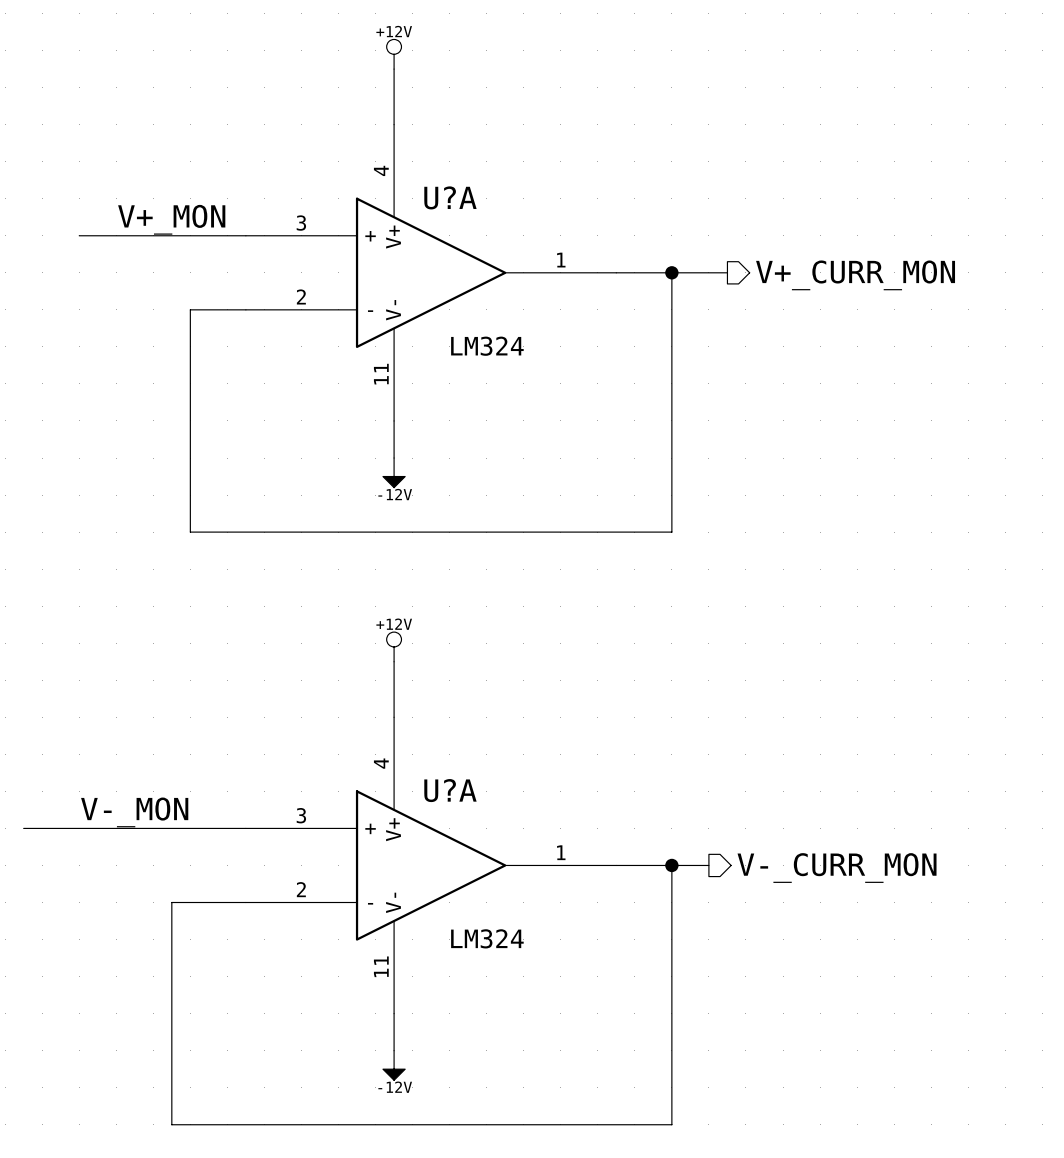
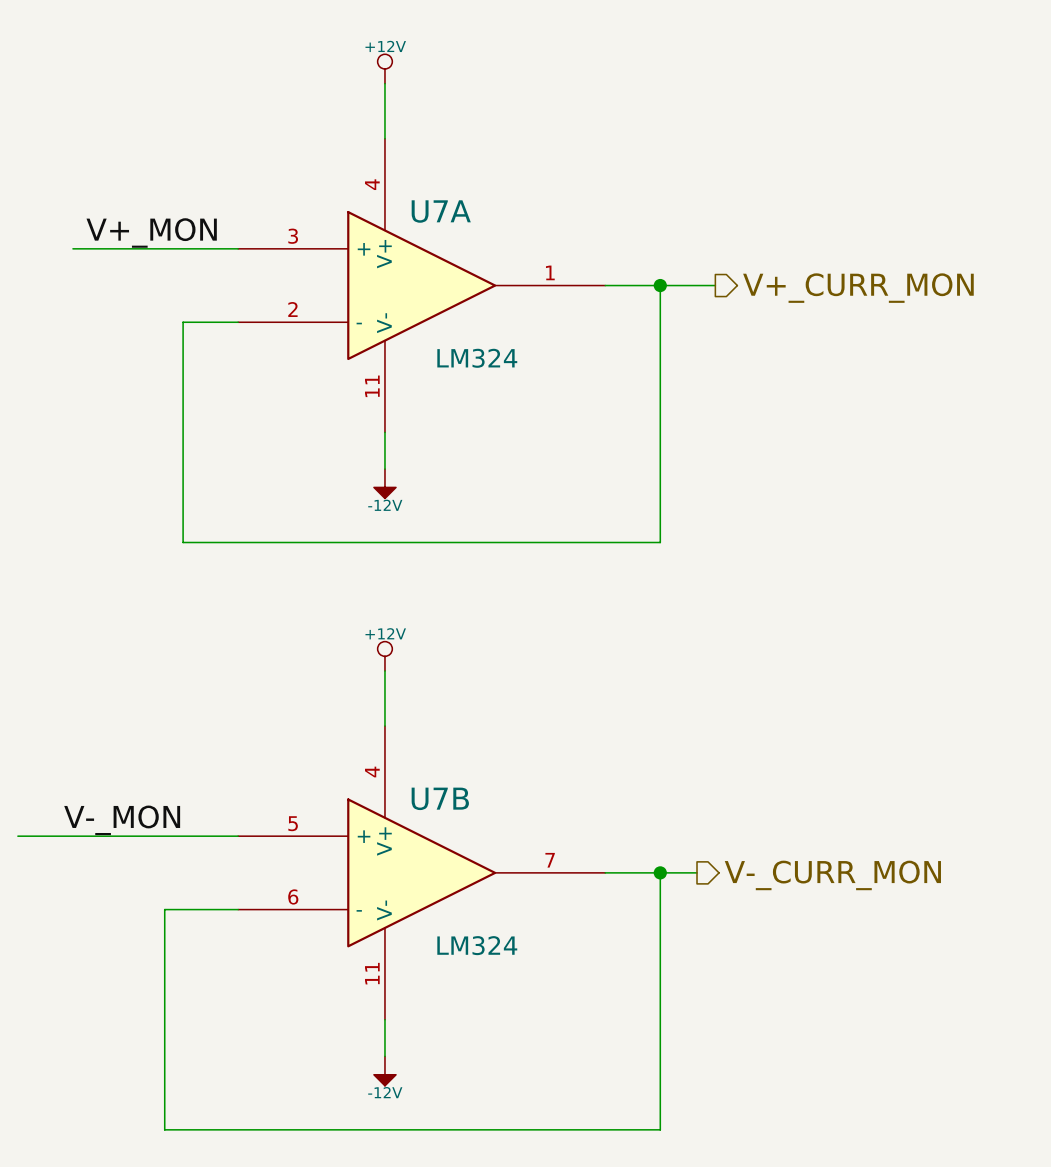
U?A name: U?A (450, 197) -> U7A (441, 211)
U?A name: U?A (450, 790) -> U7B (440, 798)
U?A pin number: 3 (301, 815) -> 5 (293, 823)
U?A pin number: 1 (561, 852) -> 7 (550, 860)
U?A pin number: 2 (301, 889) -> 6 (293, 896)

